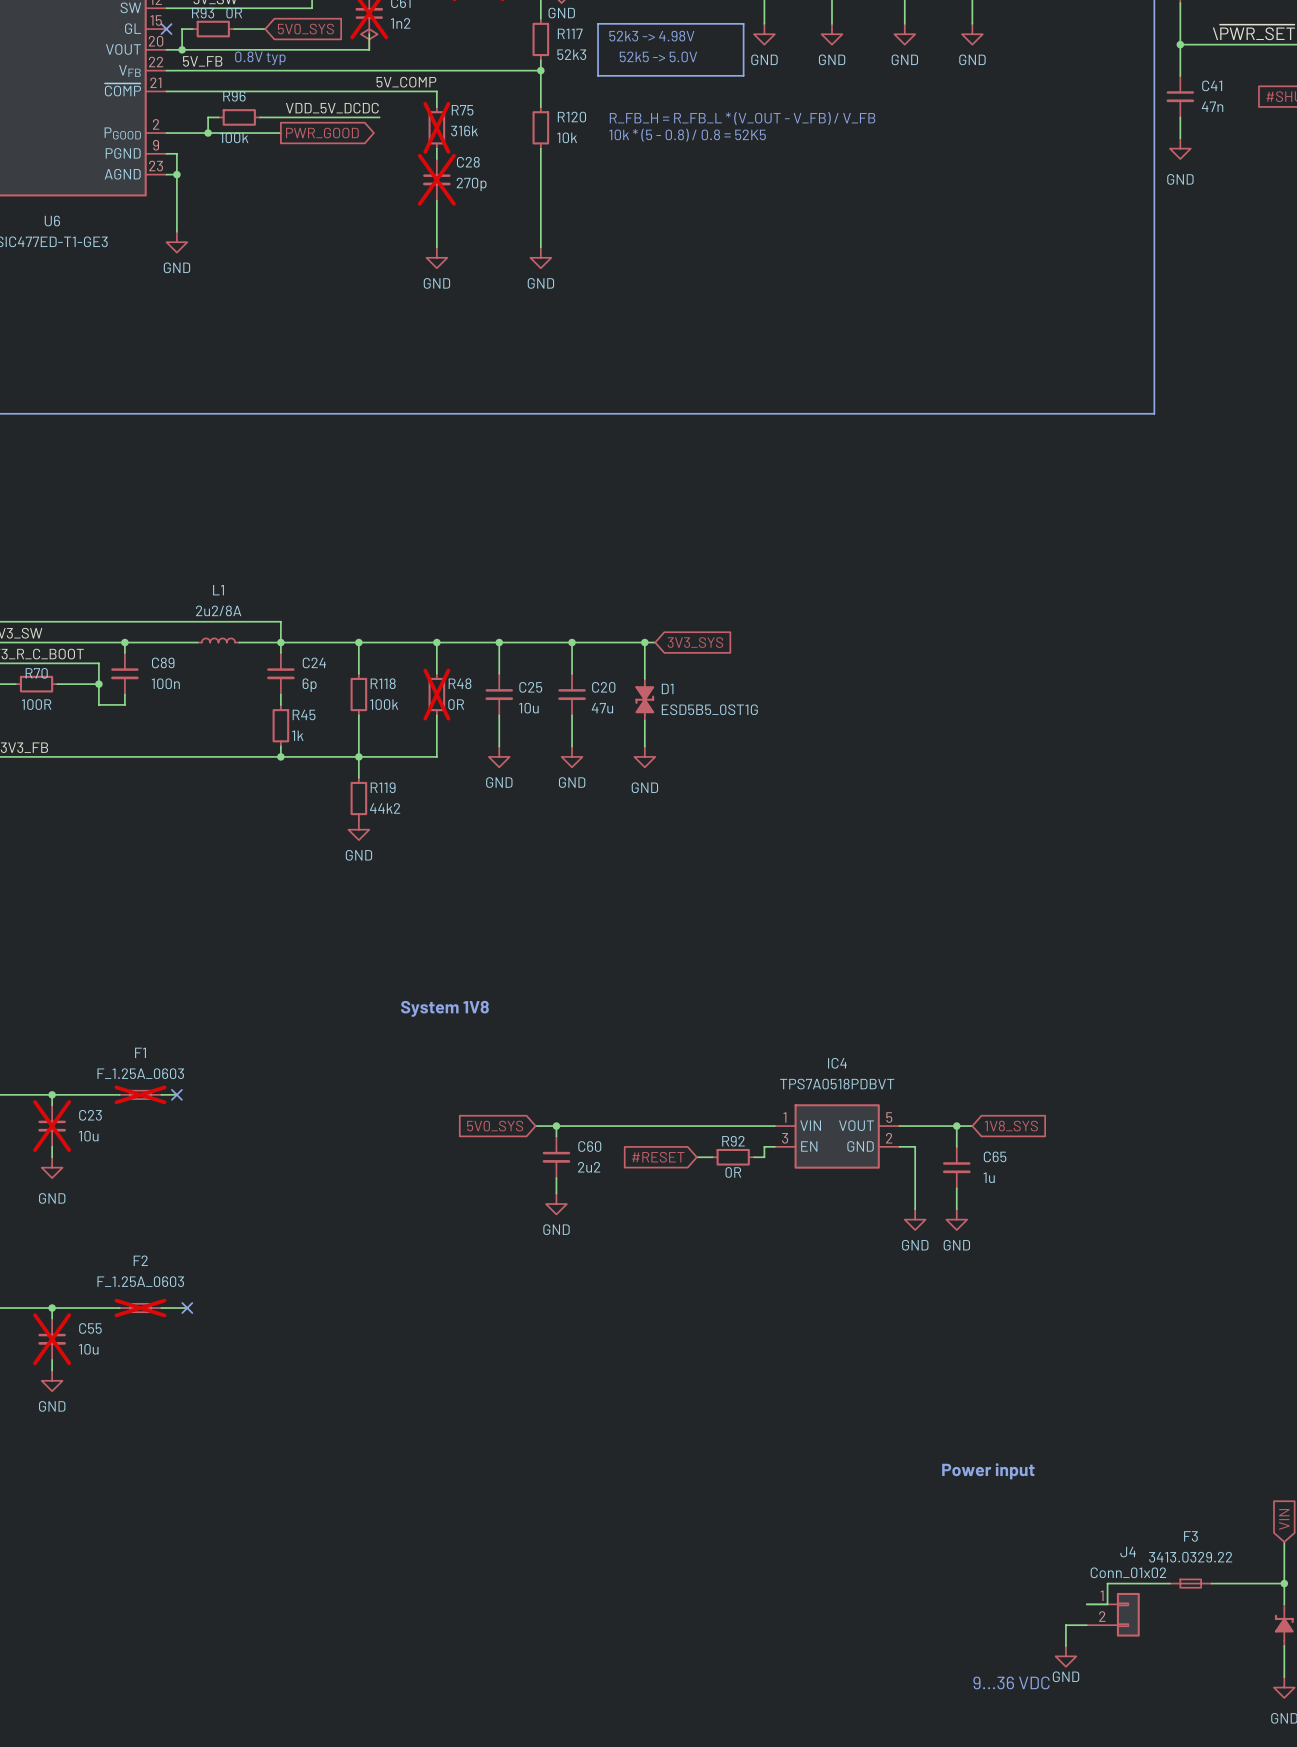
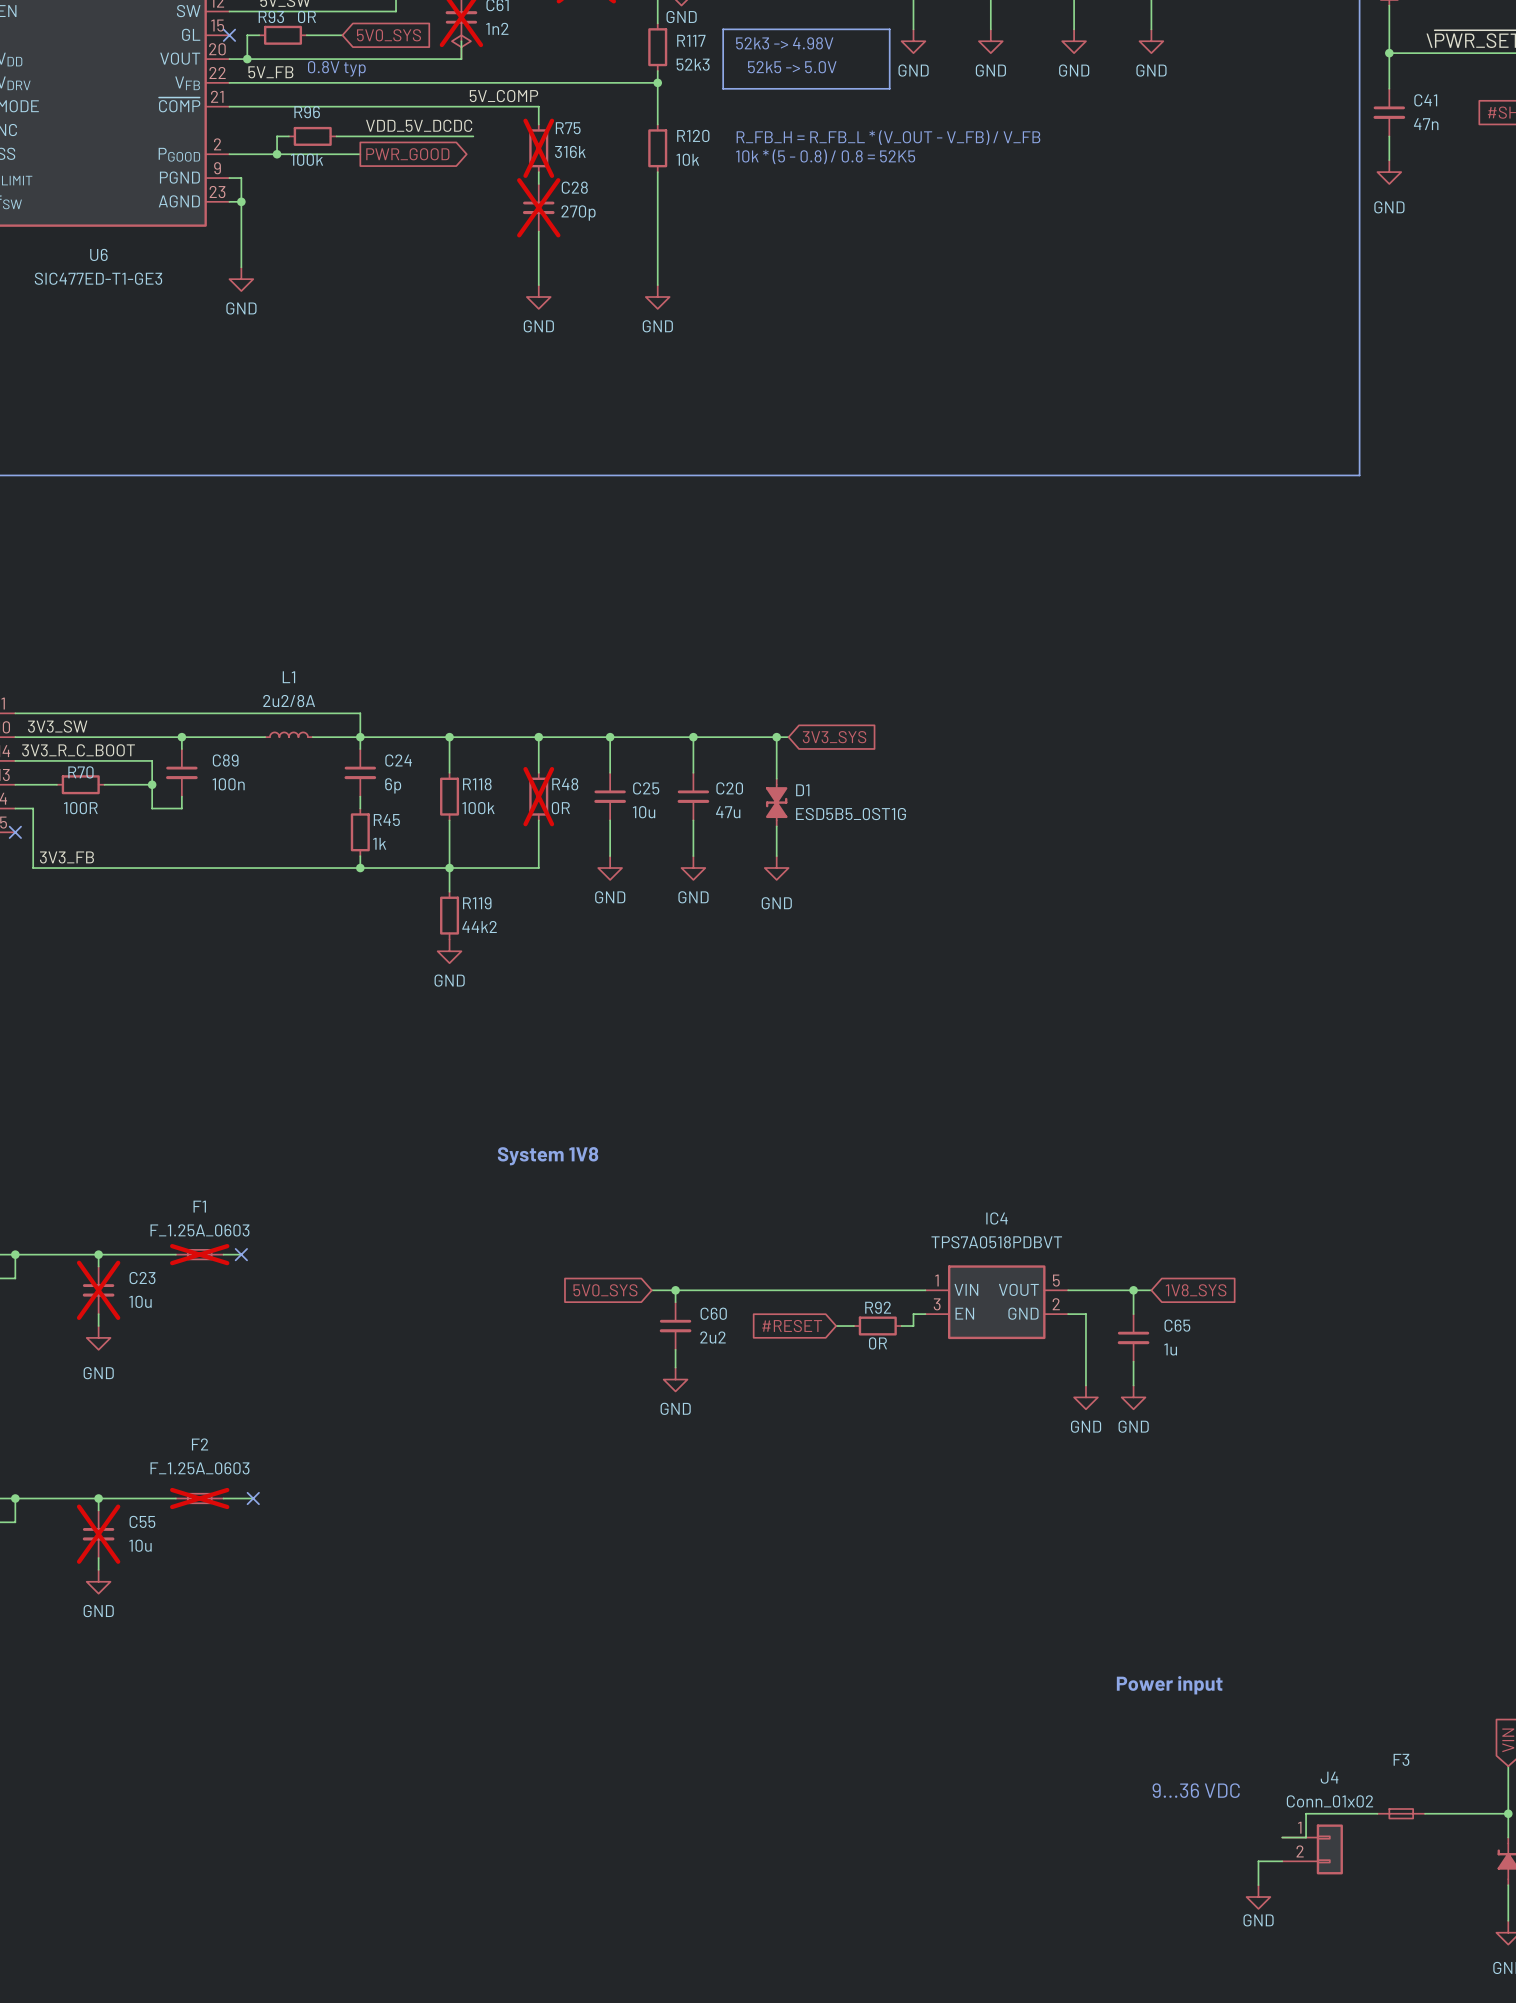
F3 text: 3413.0329.22 (1190, 1557) -> none
text position: 9...36 VDC (1011, 1682) -> 9...36 VDC (1196, 1790)

